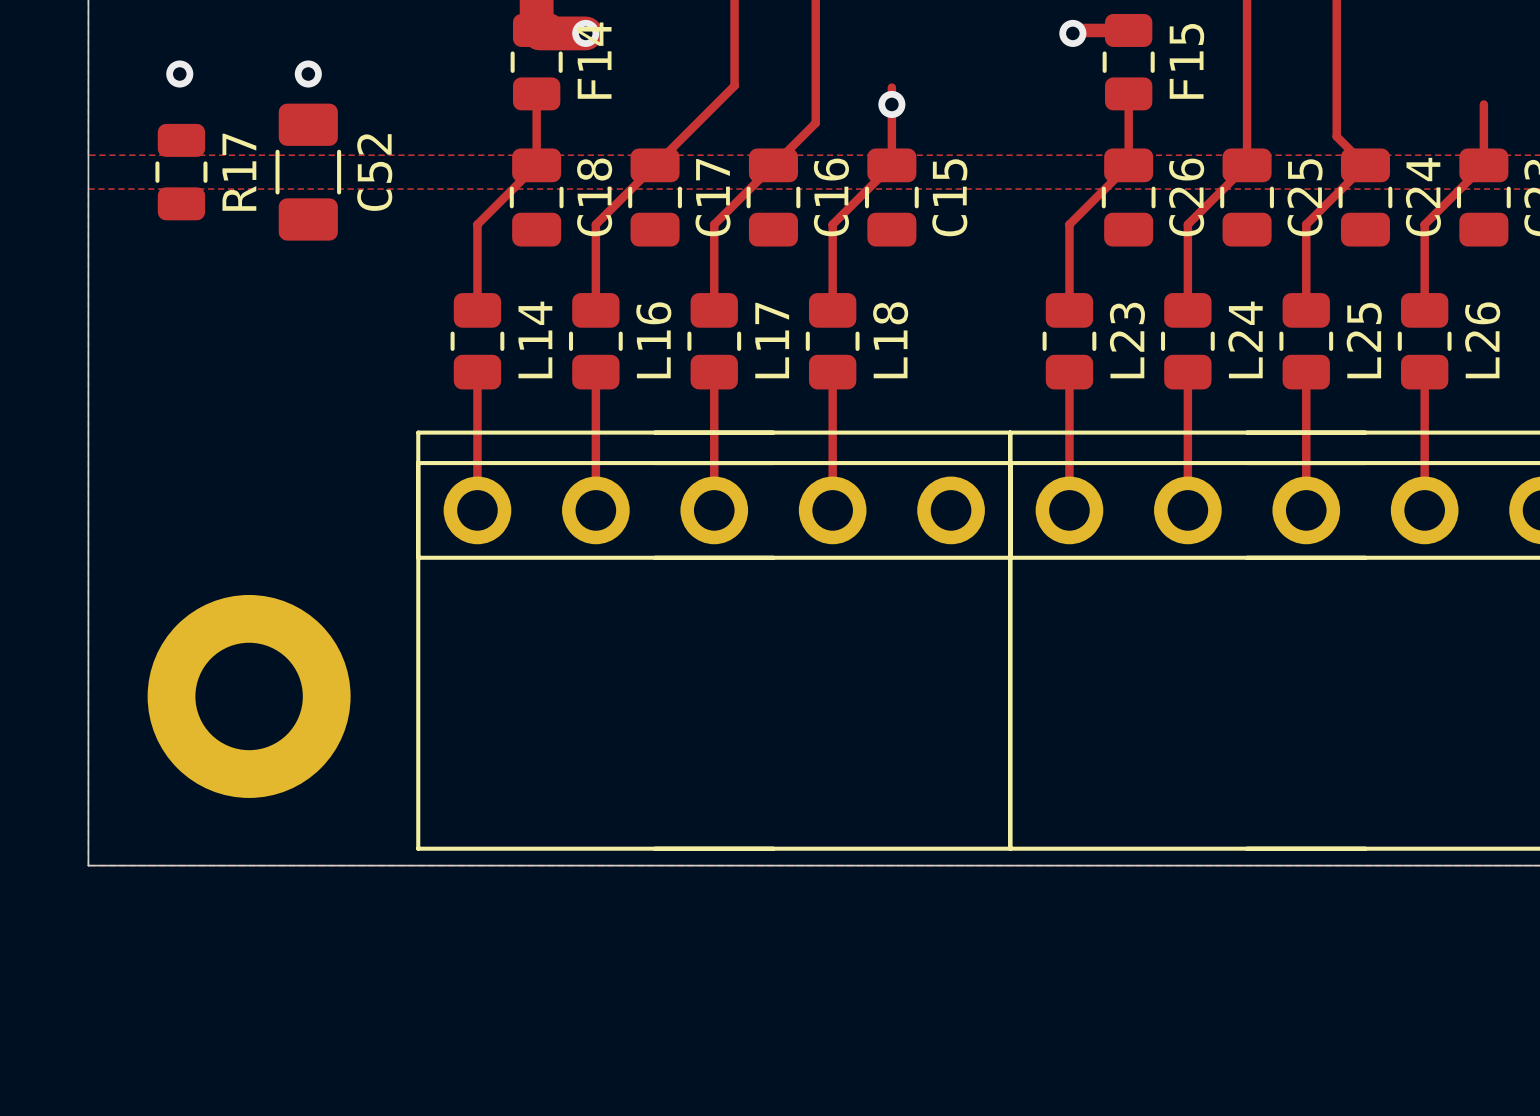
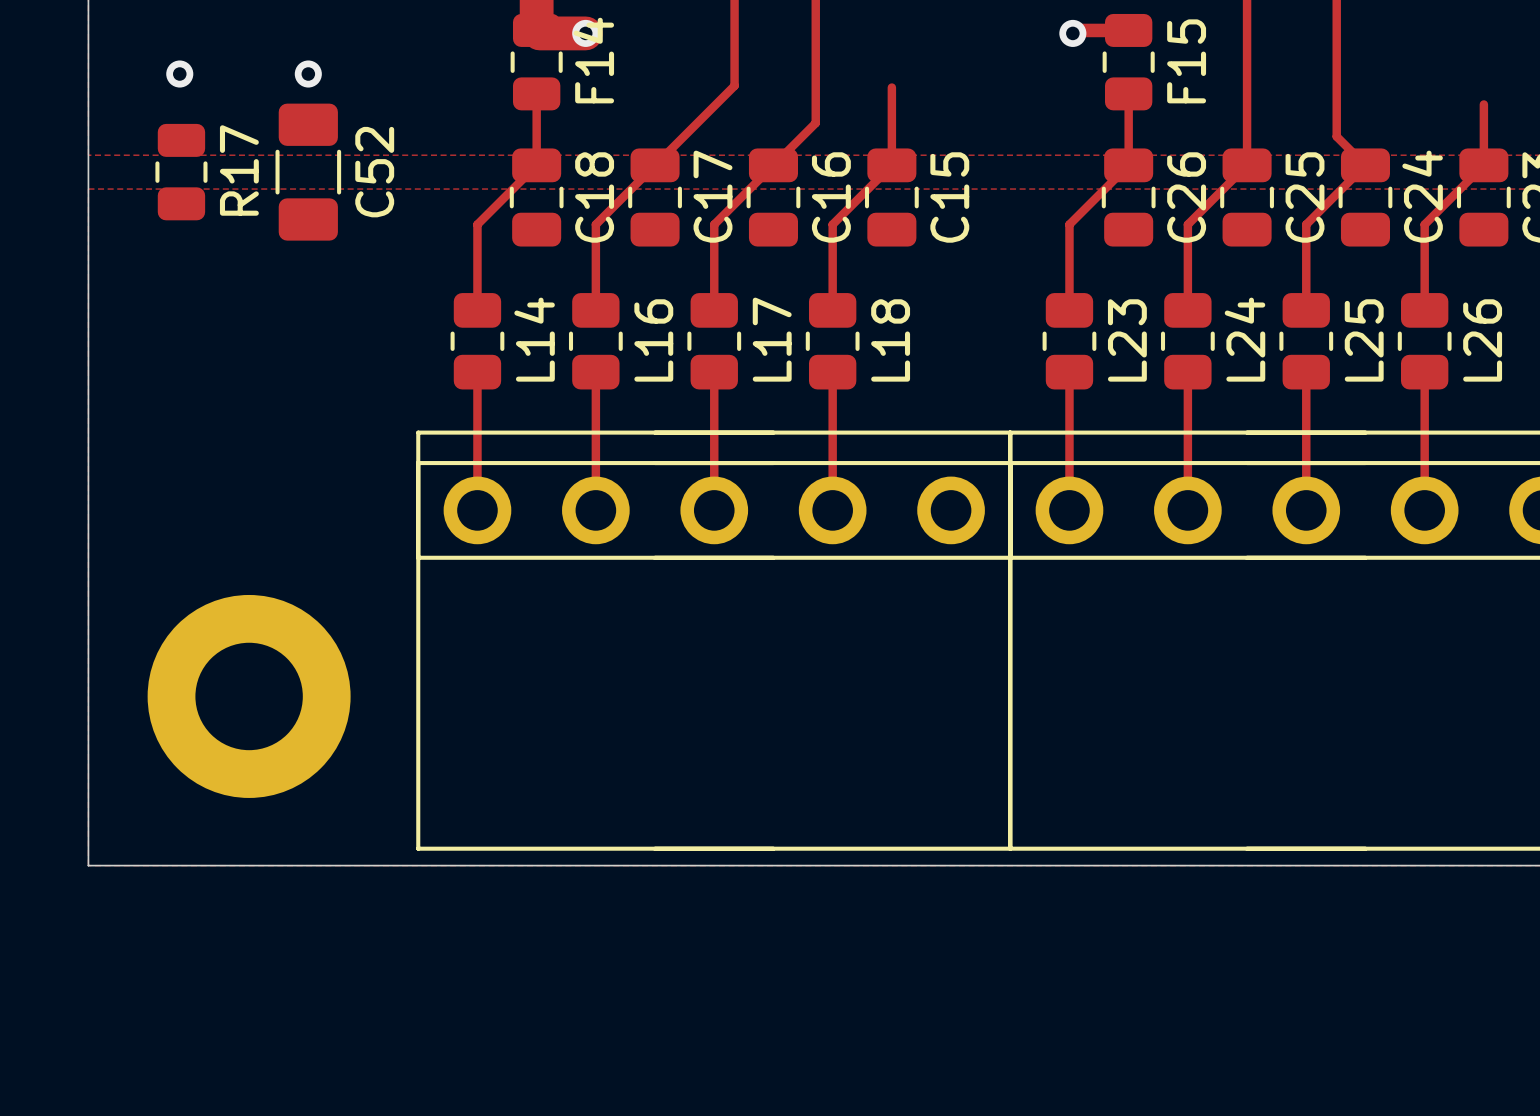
via: (891, 104) -> none

